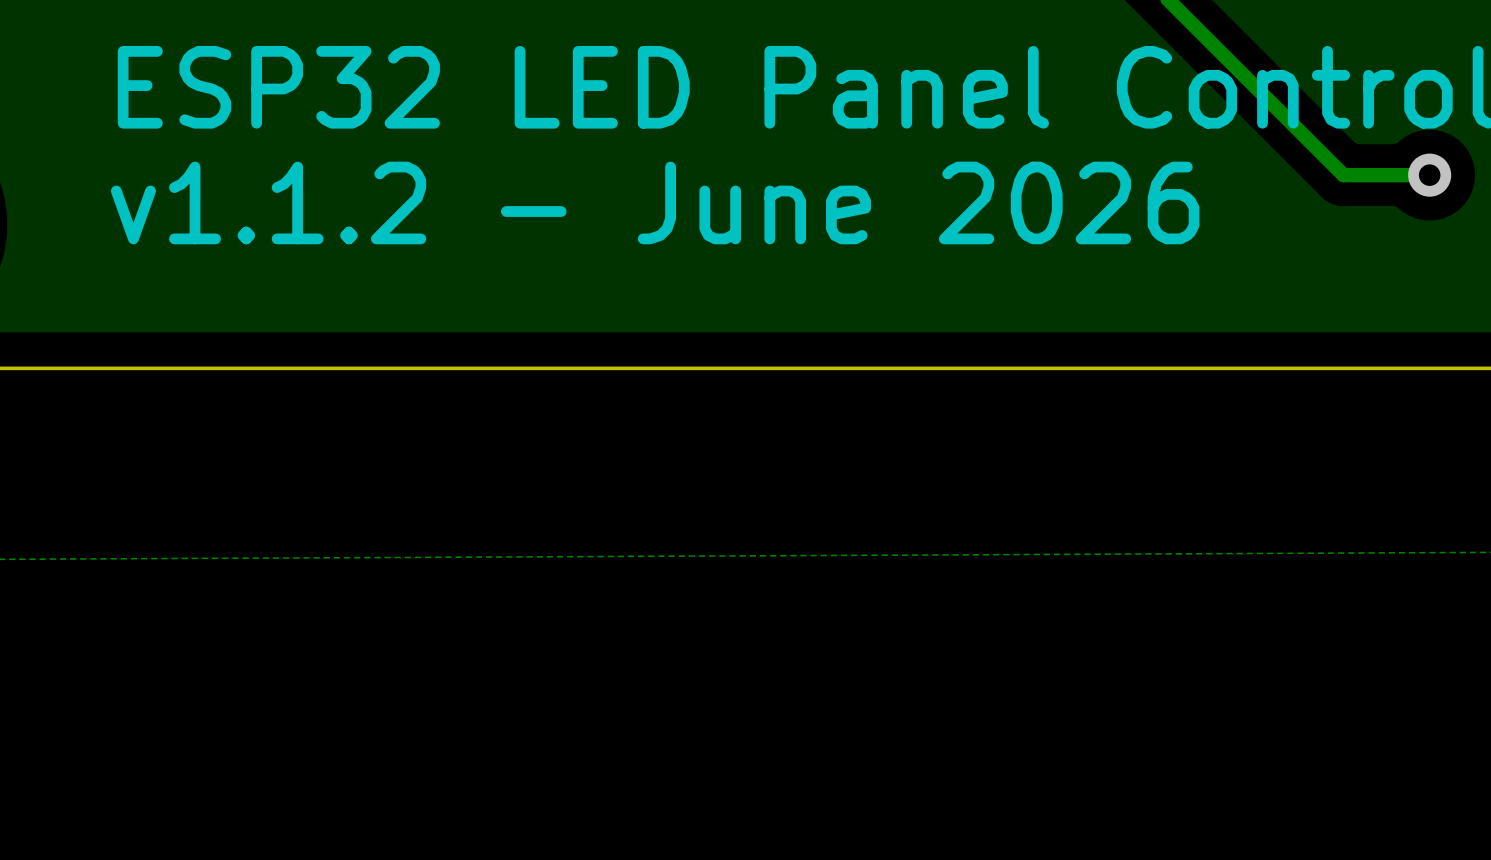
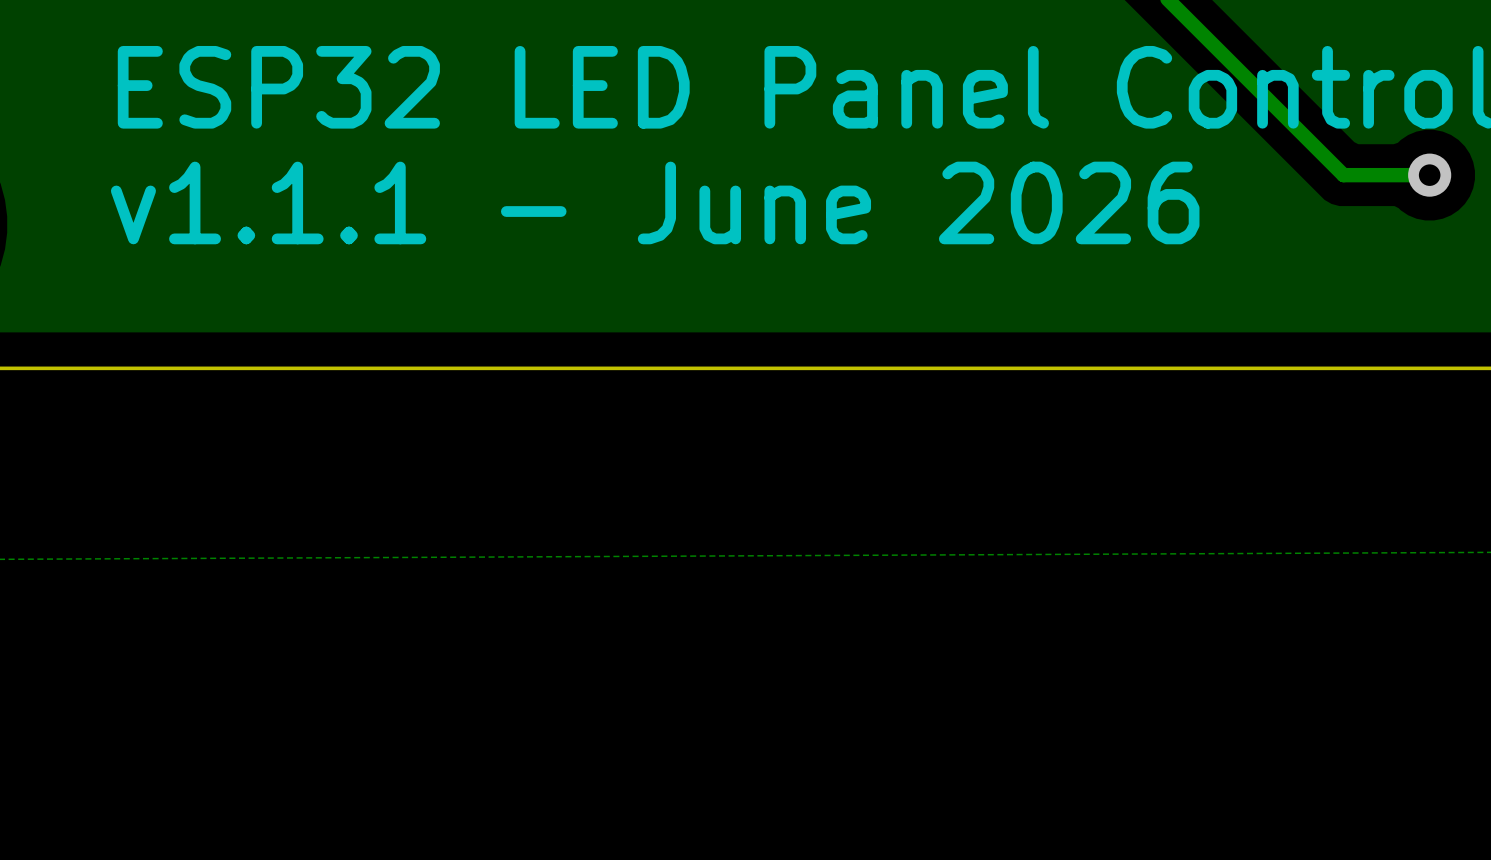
text: v1.1.2 - June 2026 (655, 202) -> v1.1.1 - June 2026 (655, 202)

